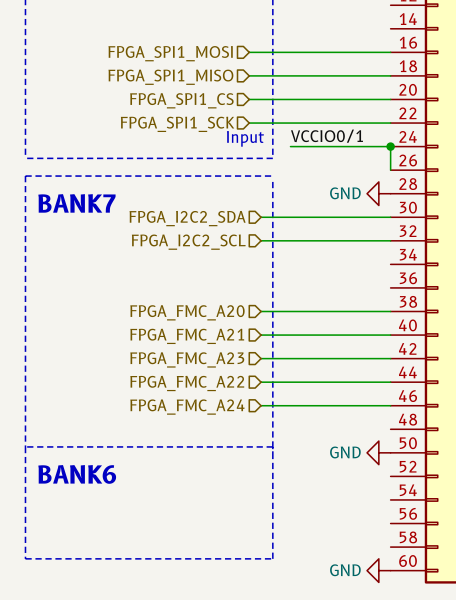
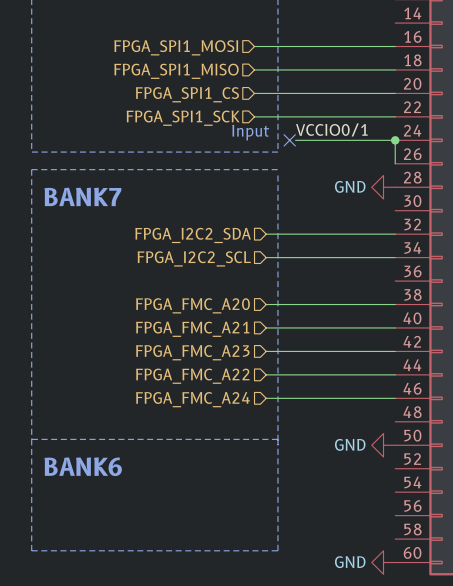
no-connect mark: none -> (289, 140)
wire: (261, 217) (390, 217) -> (266, 257) (395, 257)
hierarchical label: FPGA_I2C2_SDA (187, 218) -> none
hierarchical label: FPGA_I2C2_SCL (188, 242) -> FPGA_I2C2_SDA (193, 235)
hierarchical label: none -> FPGA_I2C2_SCL (194, 258)

